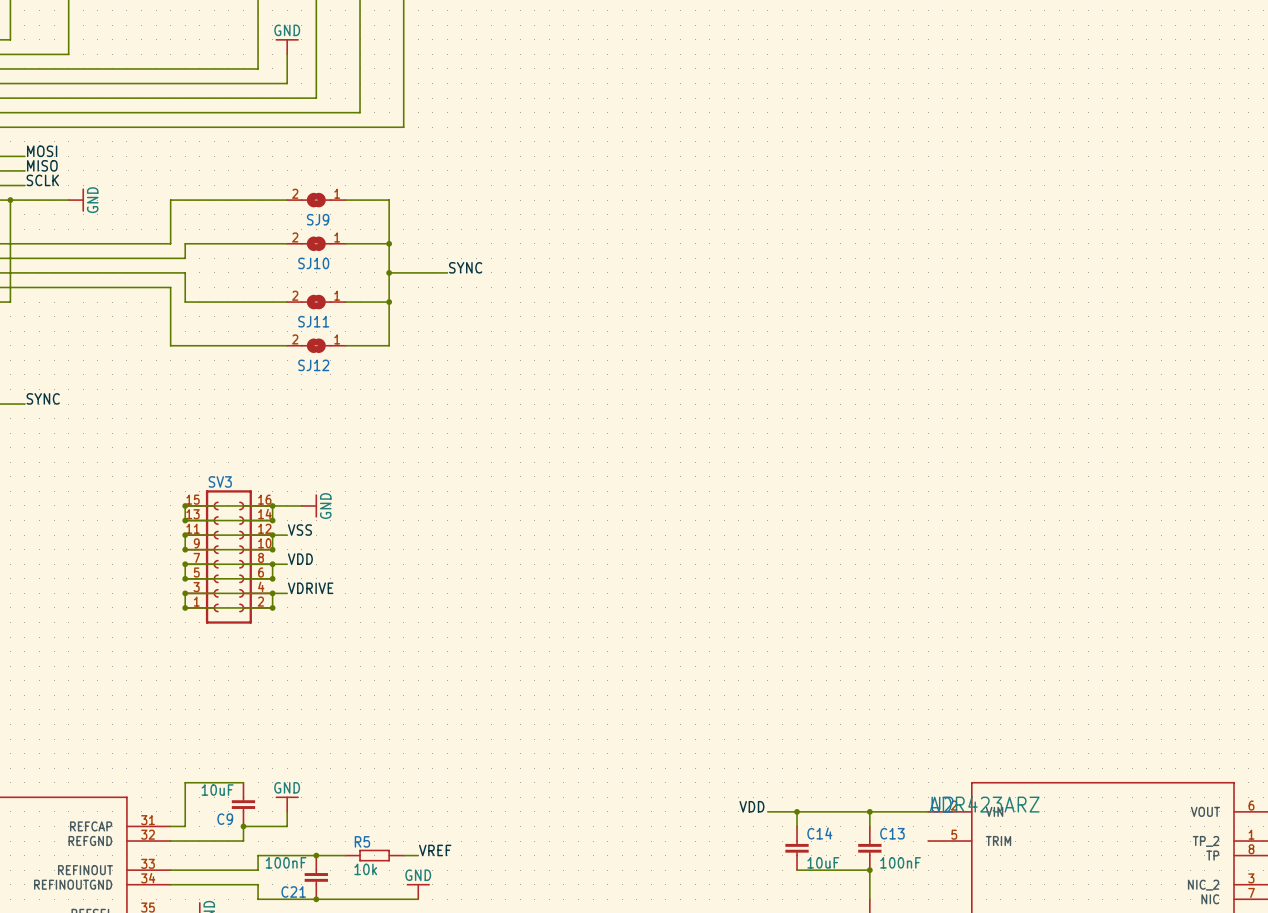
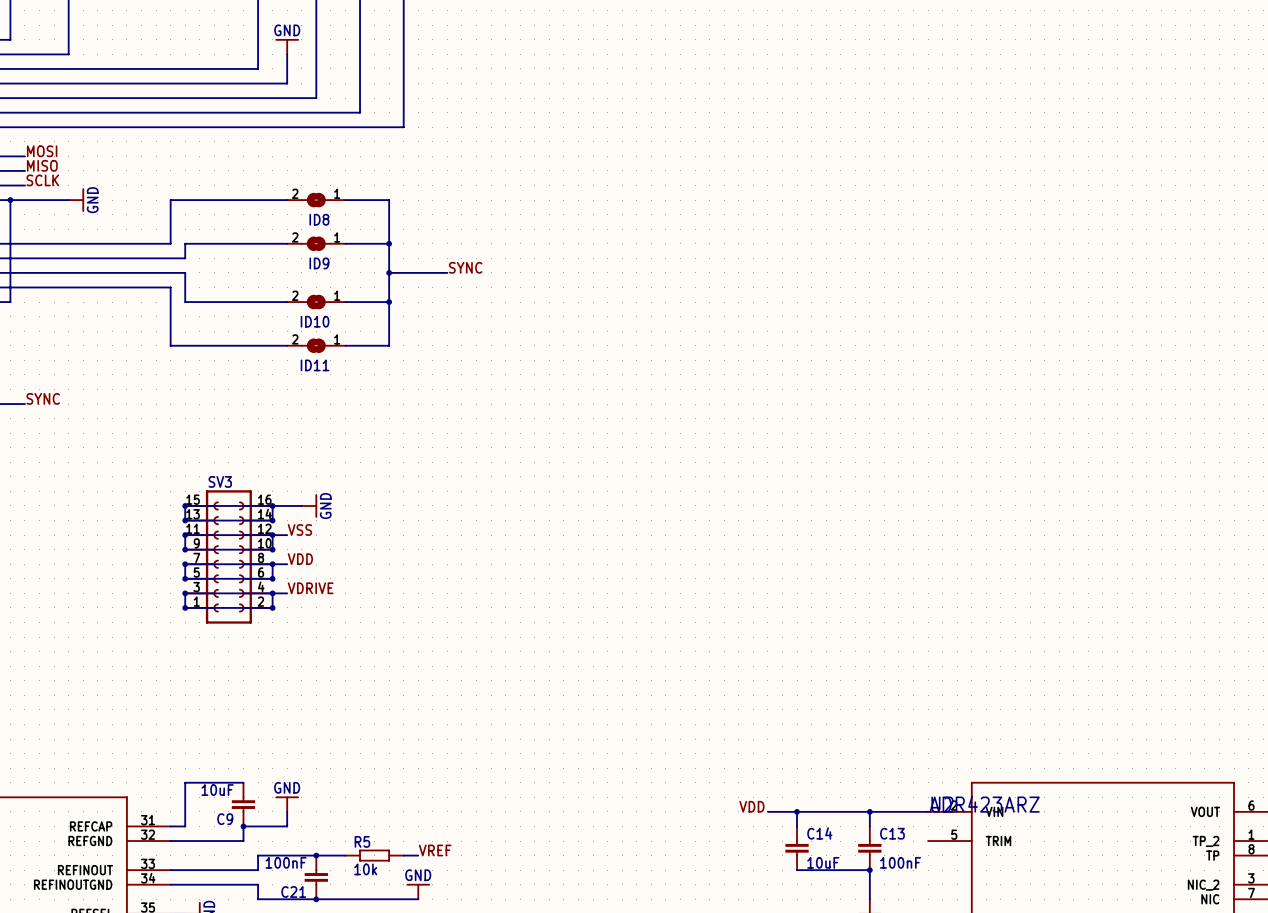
SJ9 name: SJ9 (318, 219) -> ID8 (319, 219)
SJ10 name: SJ10 (313, 263) -> ID9 (319, 263)
SJ11 name: SJ11 (313, 321) -> ID10 (315, 321)
SJ12 name: SJ12 (313, 365) -> ID11 (315, 365)

